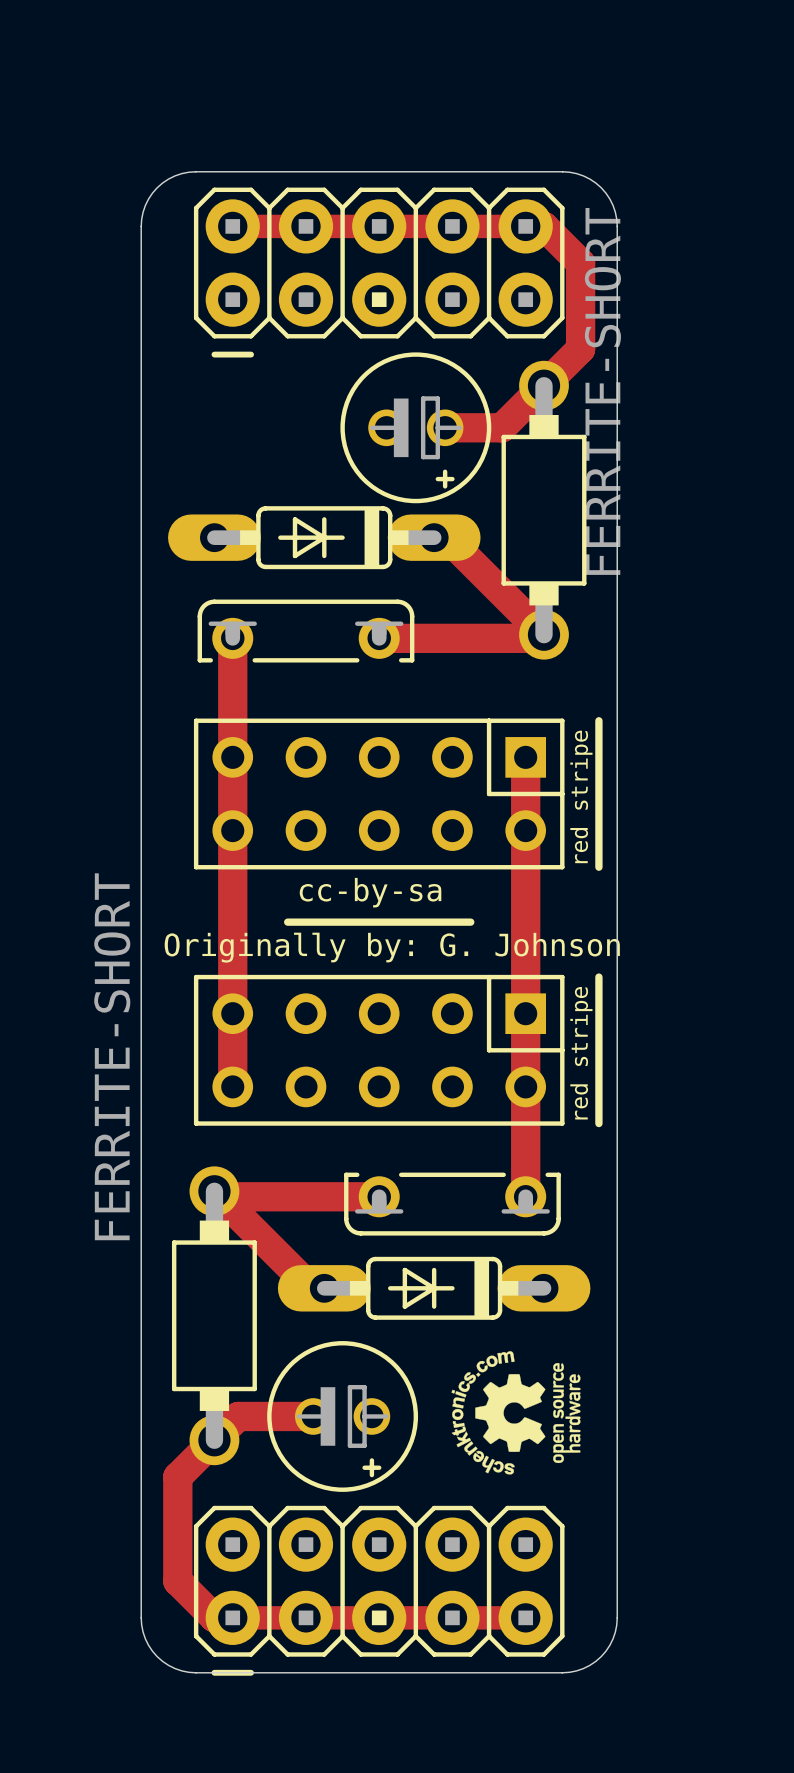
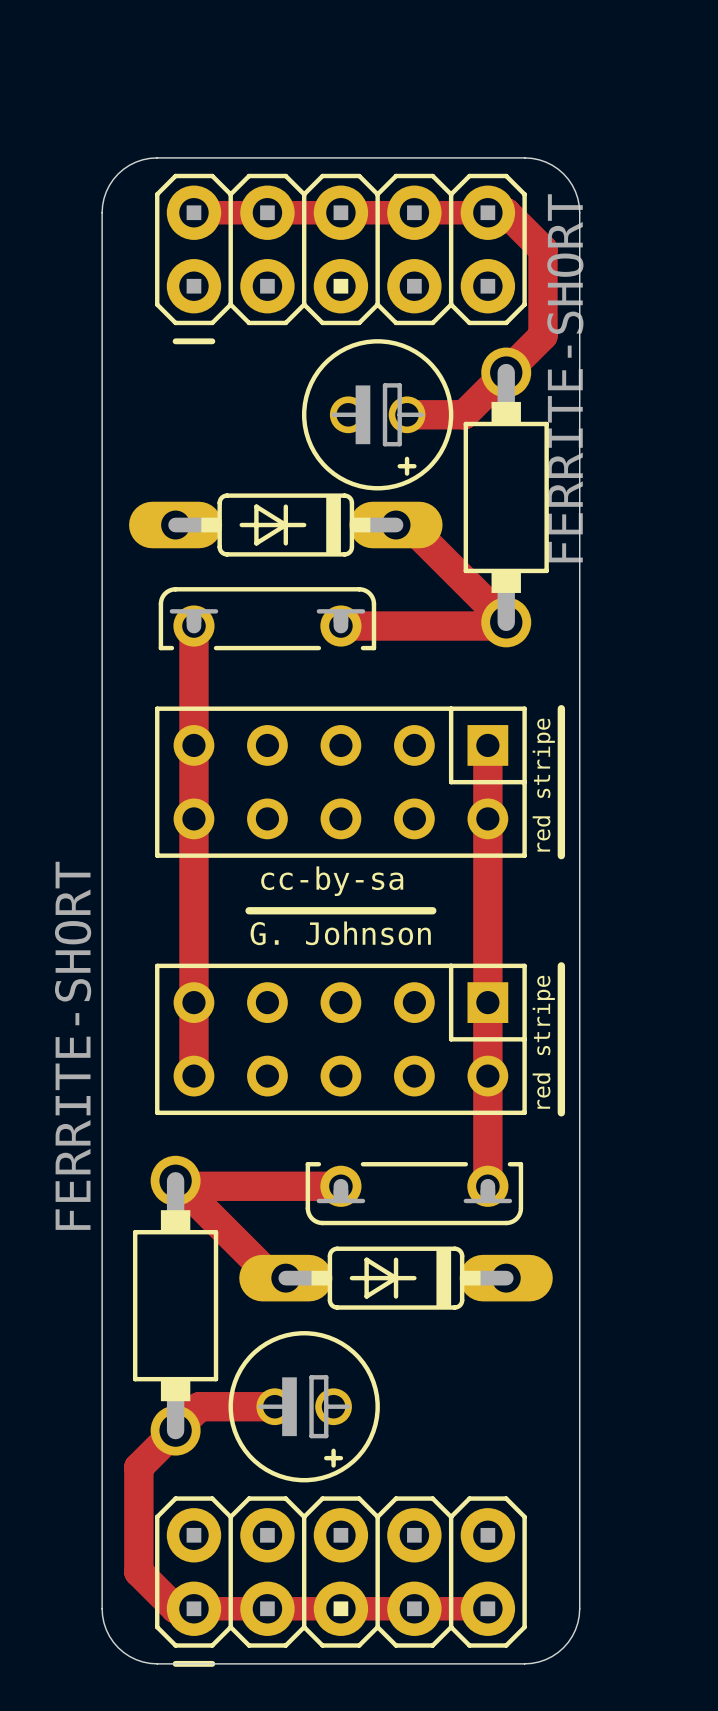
text: none -> G. Johnson (340, 933)
text: Originally by: G. Johnson (392, 947) -> none
drawing: [451, 1351, 581, 1475] -> none

